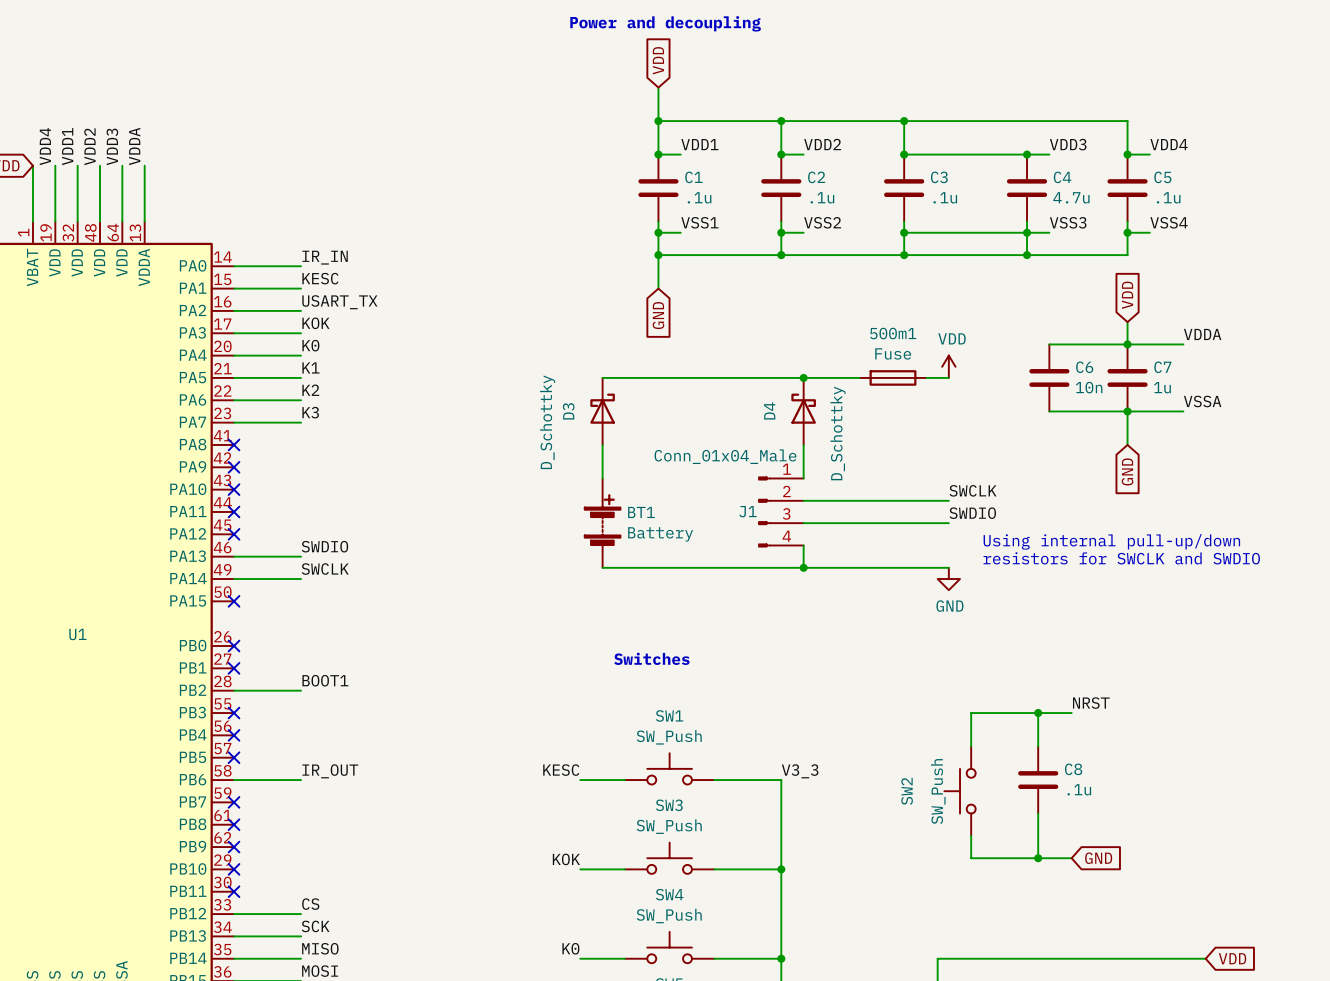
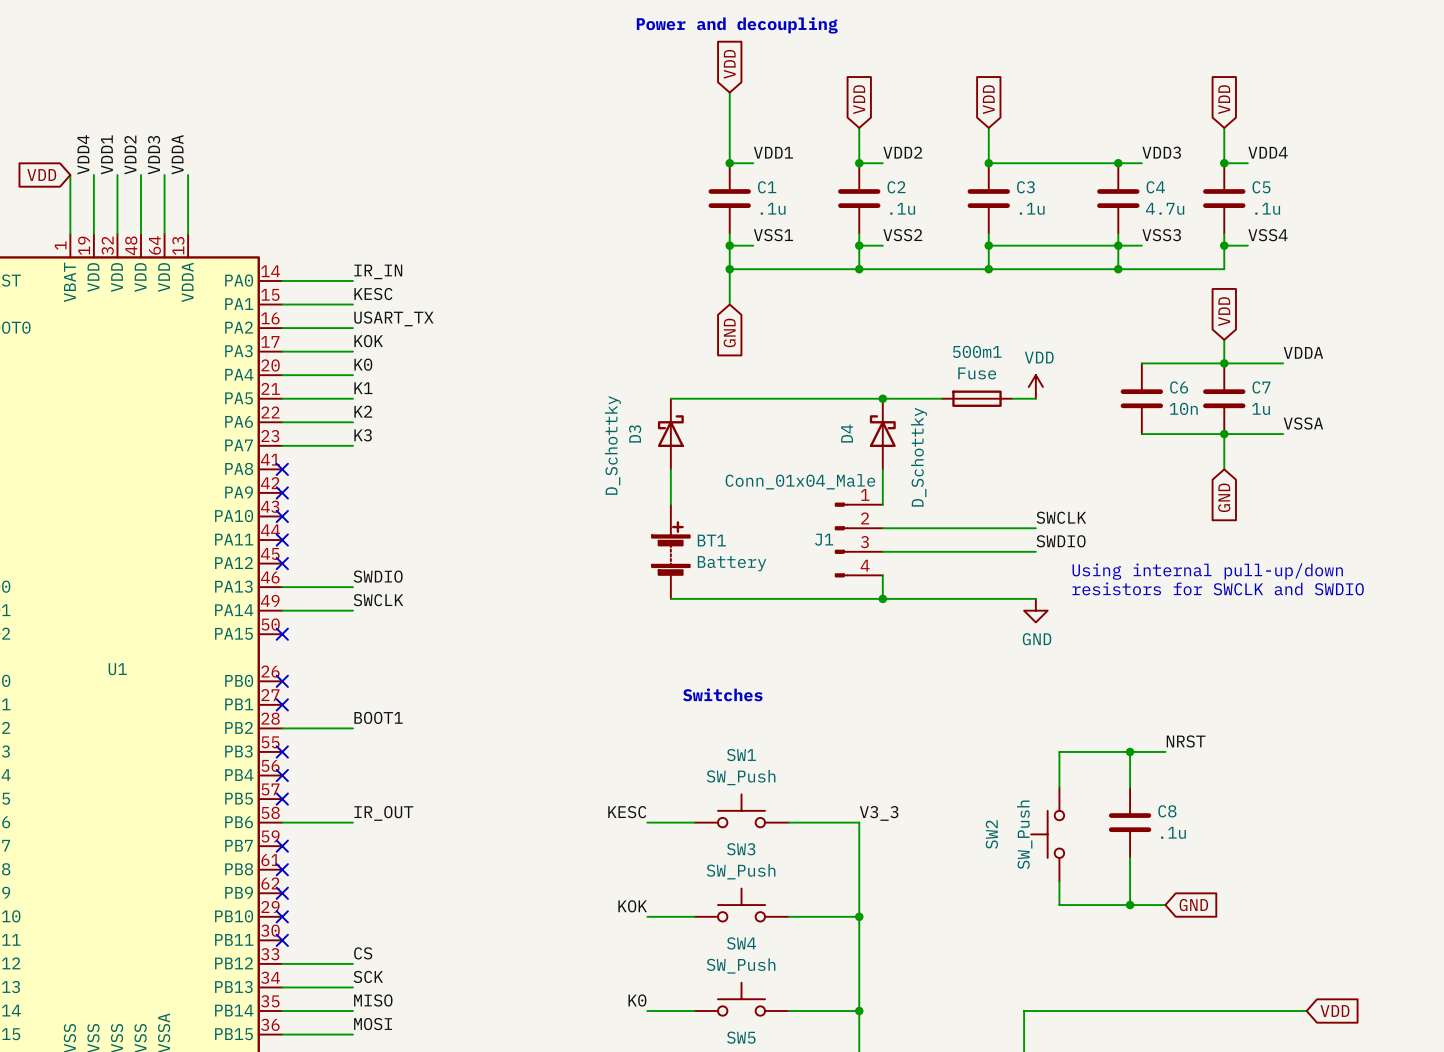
global label: none -> VDD (859, 99)
global label: none -> VDD (988, 99)
global label: none -> VDD (1224, 99)
wire: (658, 121) (1127, 121) -> none
junction: (658, 121) -> none
junction: (781, 121) -> none
junction: (904, 121) -> none

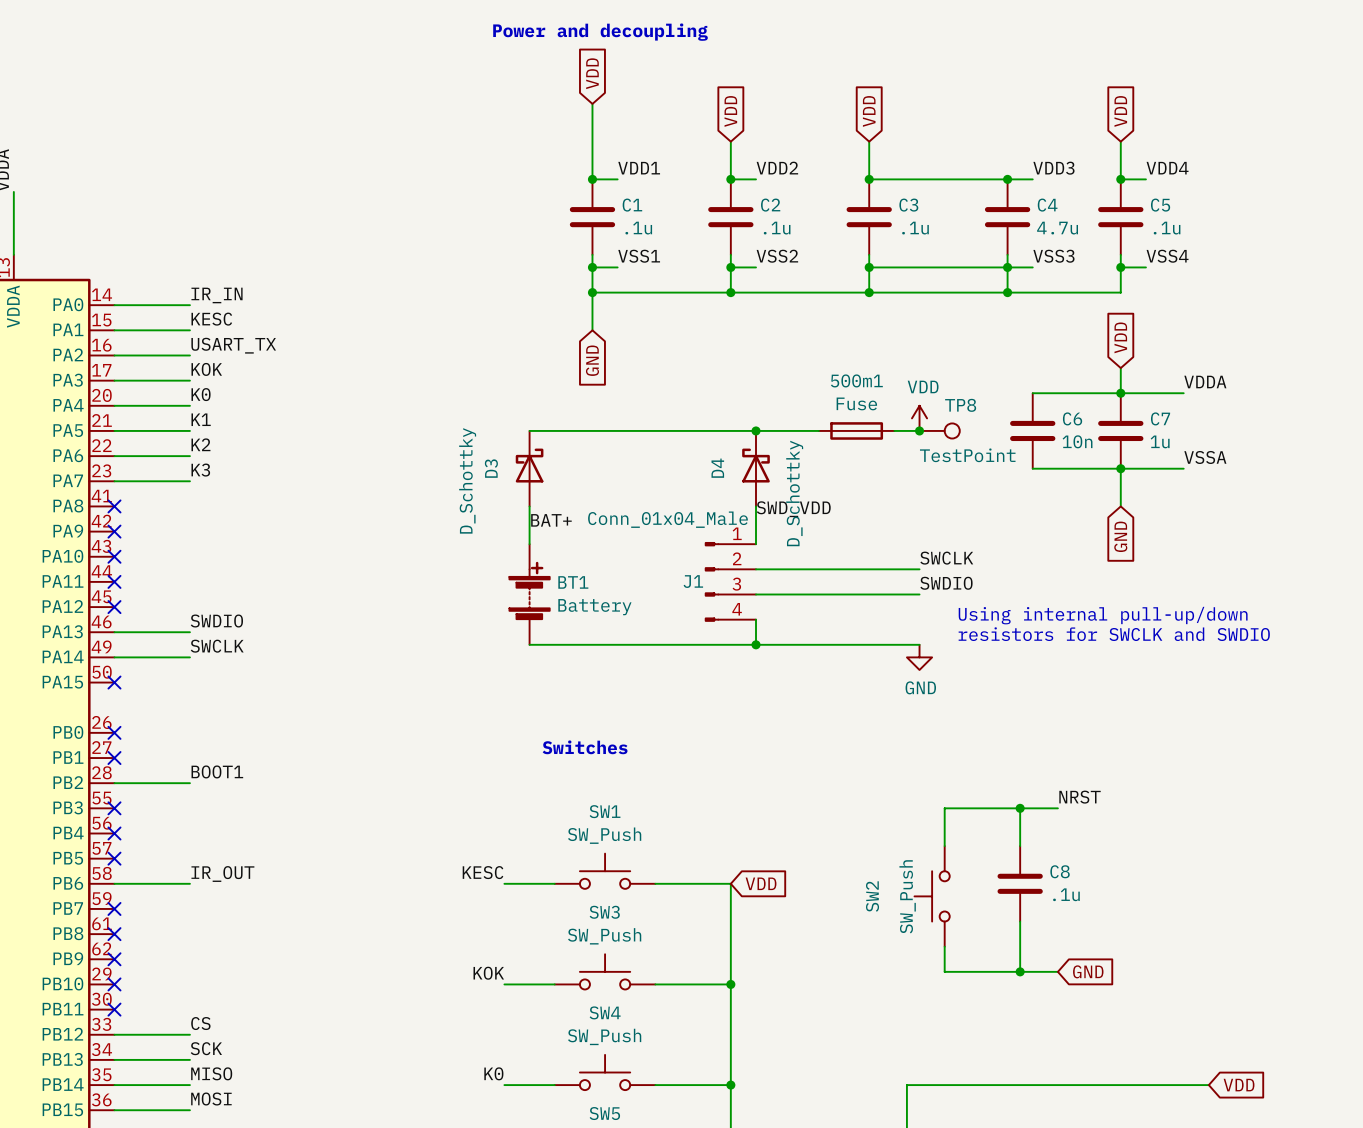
junction: none -> (919, 430)
TP8: none -> TestPoint (939, 430)
label: none -> SWD_VDD (793, 509)
label: none -> BAT+ (551, 520)
label: V3_3 (879, 813) -> none
global label: none -> VDD (761, 883)

